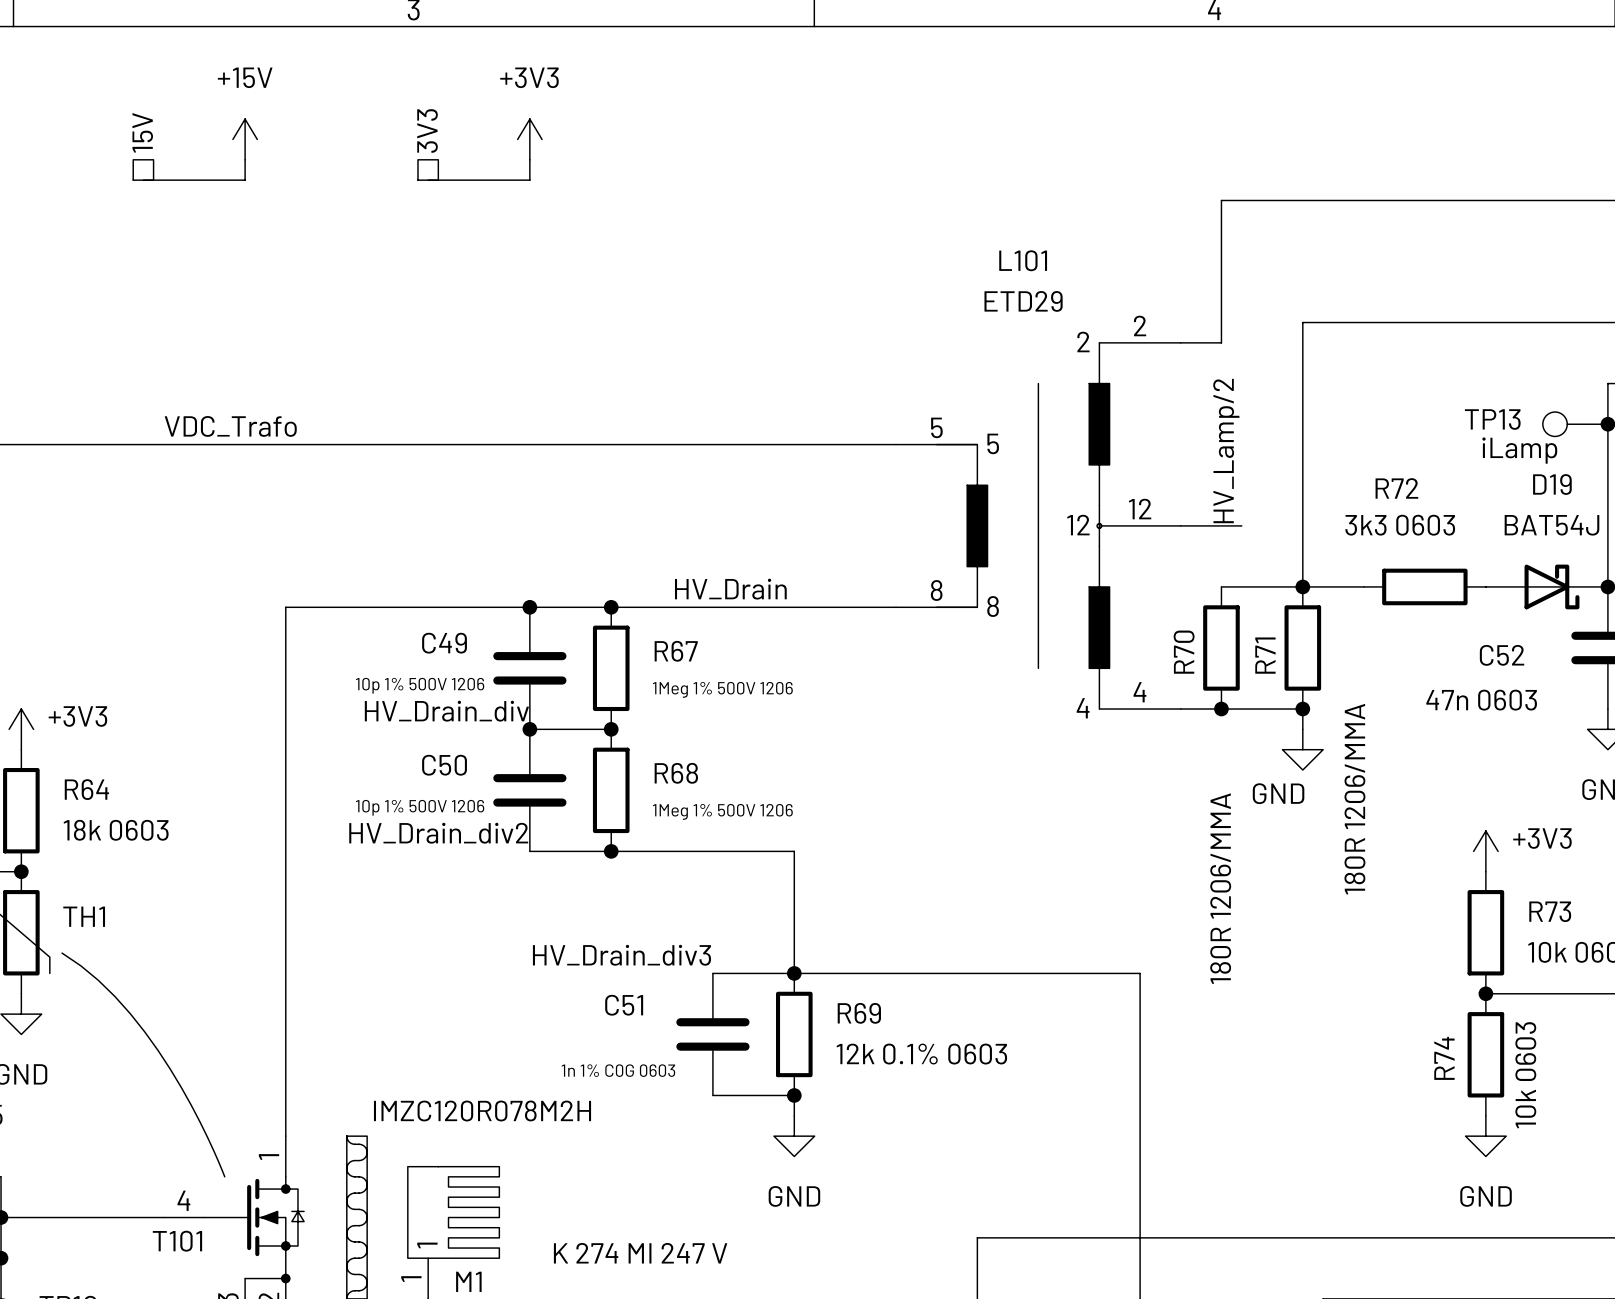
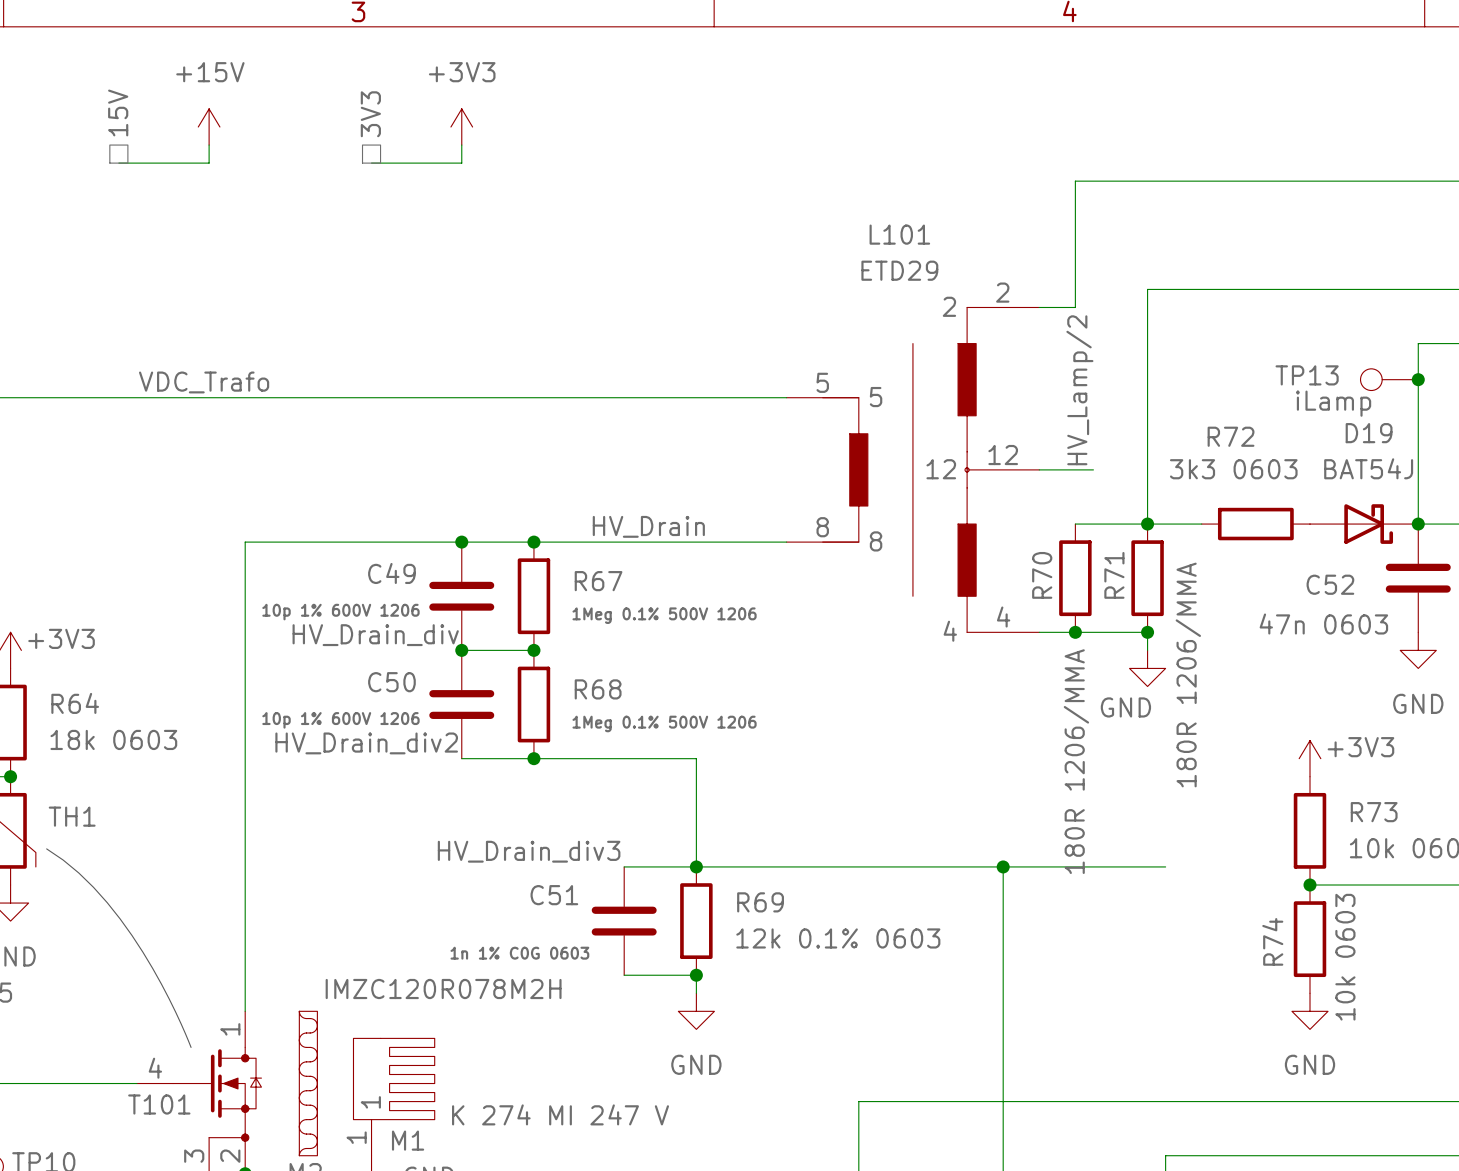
C49 value: 10p 1% 500V 1206 (420, 685) -> 10p 1% 600V 1206 (340, 612)
R67 value: 1Meg 1% 500V 1206 (722, 689) -> 1Meg 0.1% 500V 1206 (664, 615)
R71 value position: 180R 1206/MMA (1354, 799) -> 180R 1206/MMA (1188, 675)
C50 value: 10p 1% 500V 1206 (420, 807) -> 10p 1% 600V 1206 (340, 720)
R68 value: 1Meg 1% 500V 1206 (722, 811) -> 1Meg 0.1% 500V 1206 (664, 723)
wire: none -> (1003, 866) (1165, 866)
junction: none -> (1003, 866)

